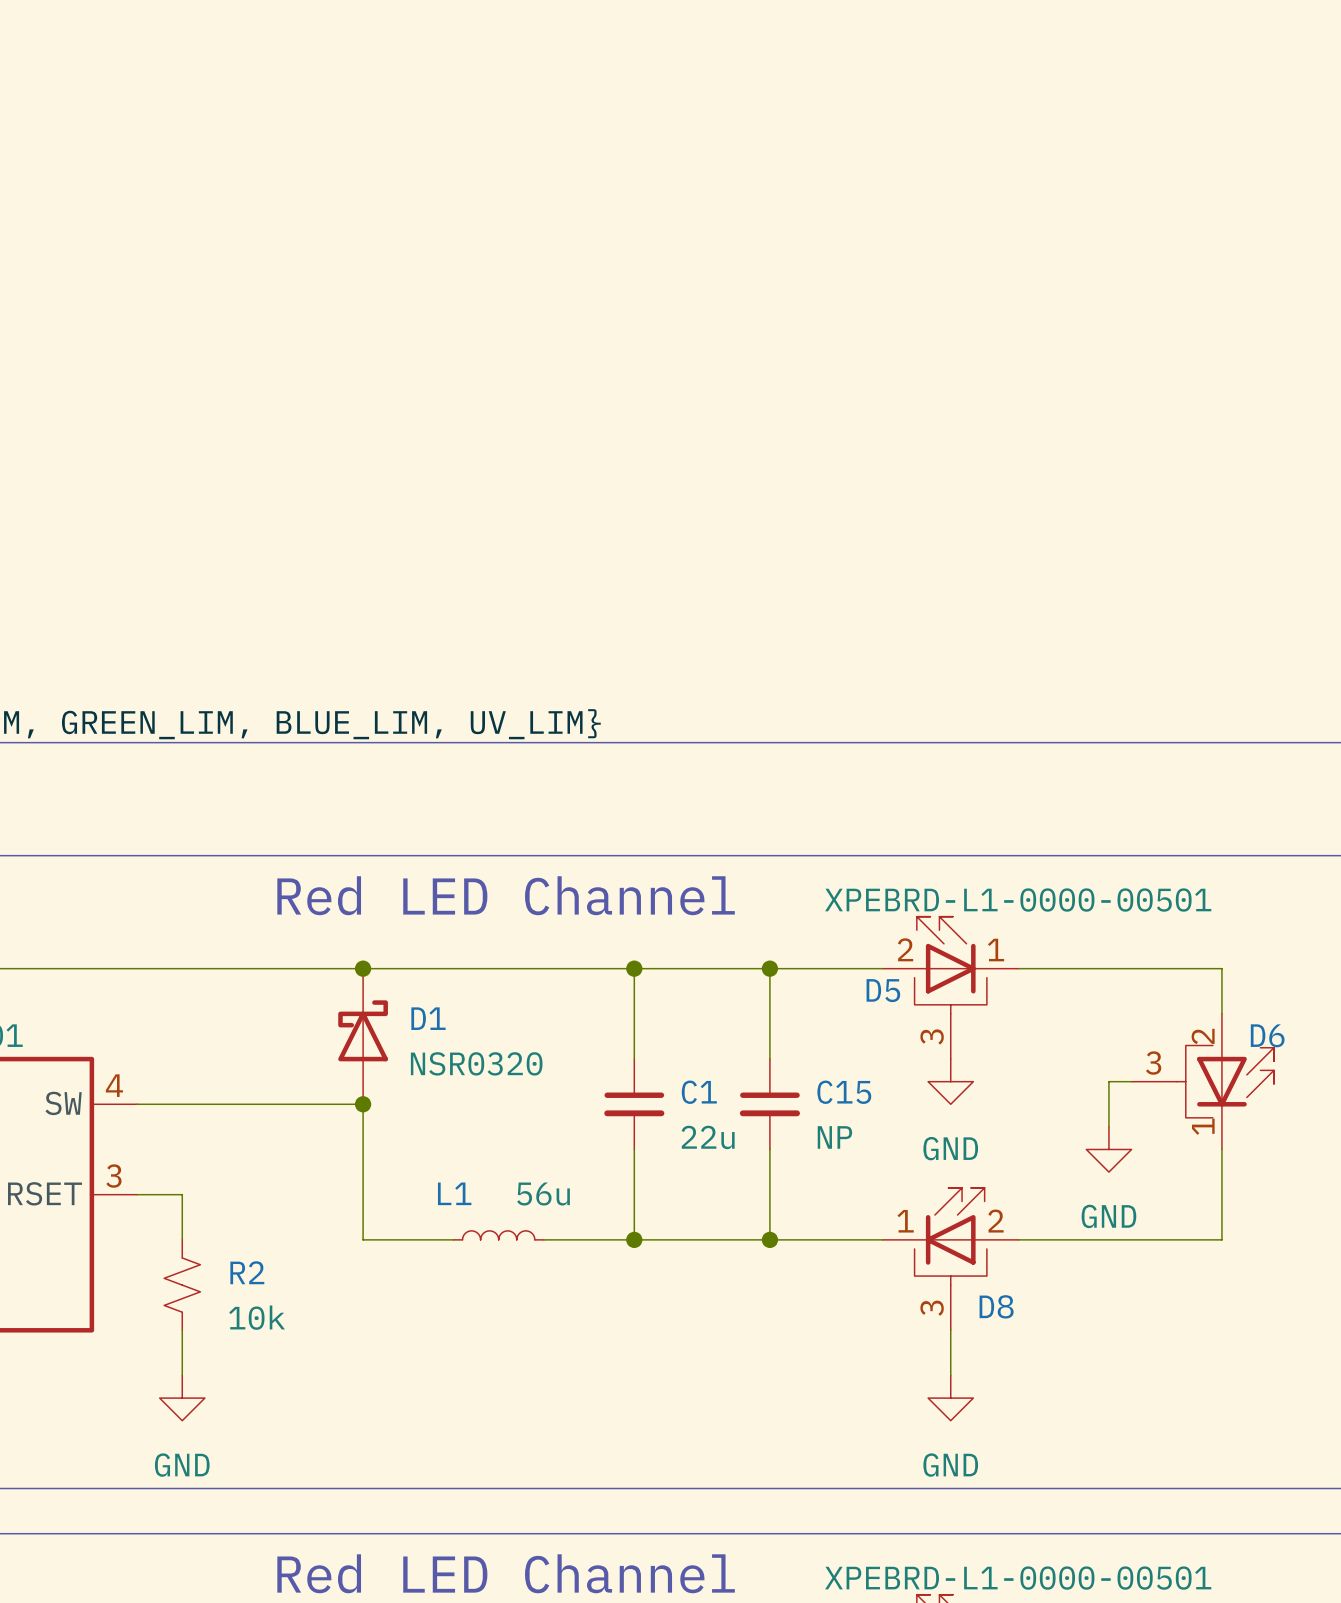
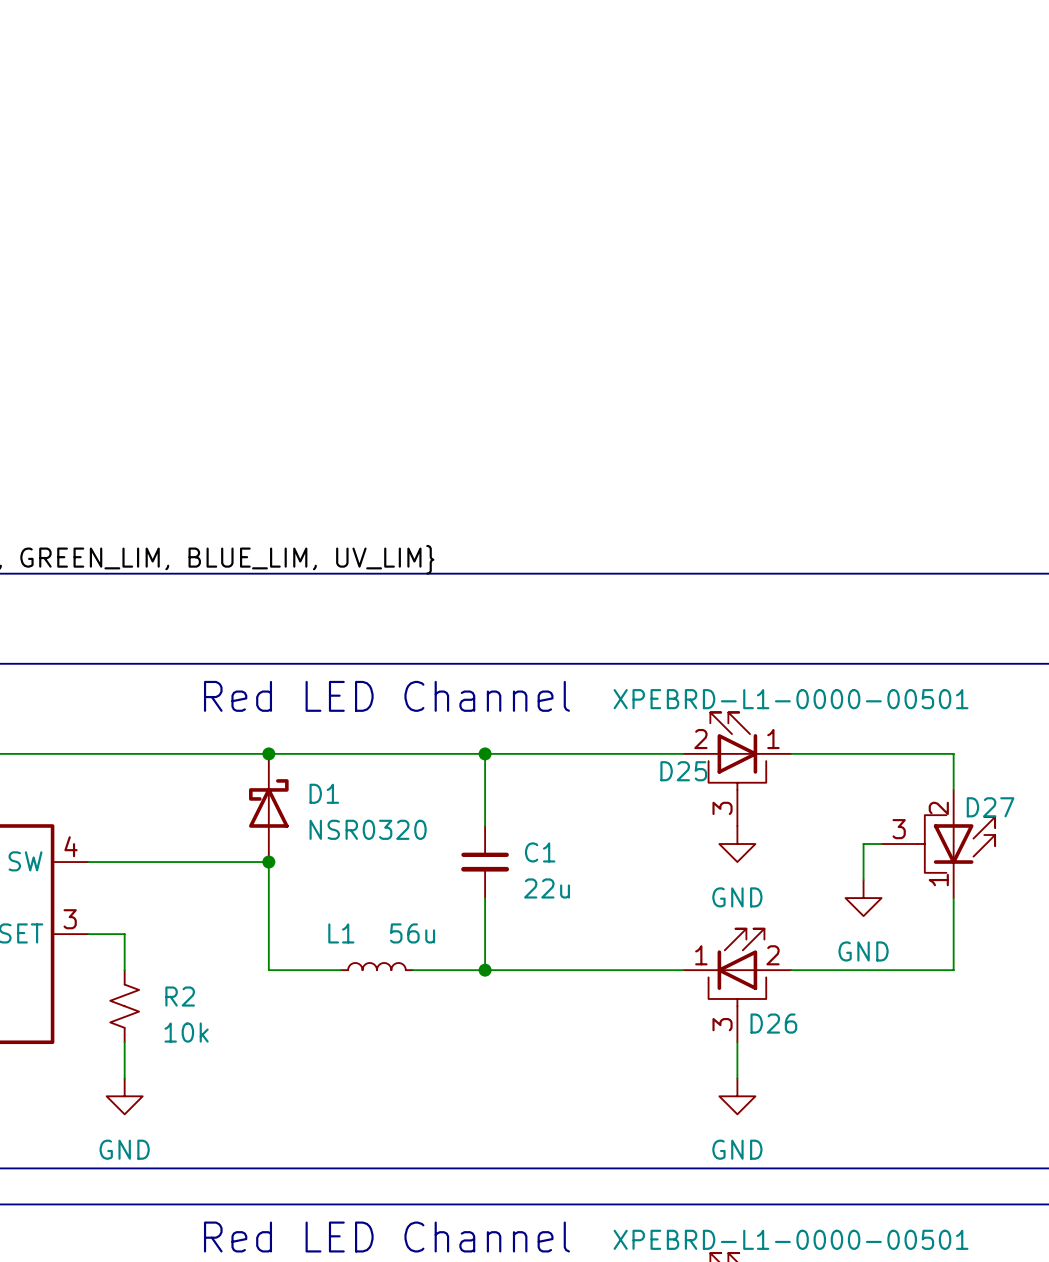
wire: (769, 968) (769, 1059) -> none
junction: (769, 968) -> none
D5 name: D5 (883, 990) -> D25 (683, 771)
D6 name: D6 (1267, 1035) -> D27 (990, 807)
C15: NP (769, 1104) -> none
wire: (769, 1149) (769, 1239) -> none
junction: (769, 1239) -> none
D8 name: D8 (996, 1306) -> D26 (773, 1023)

